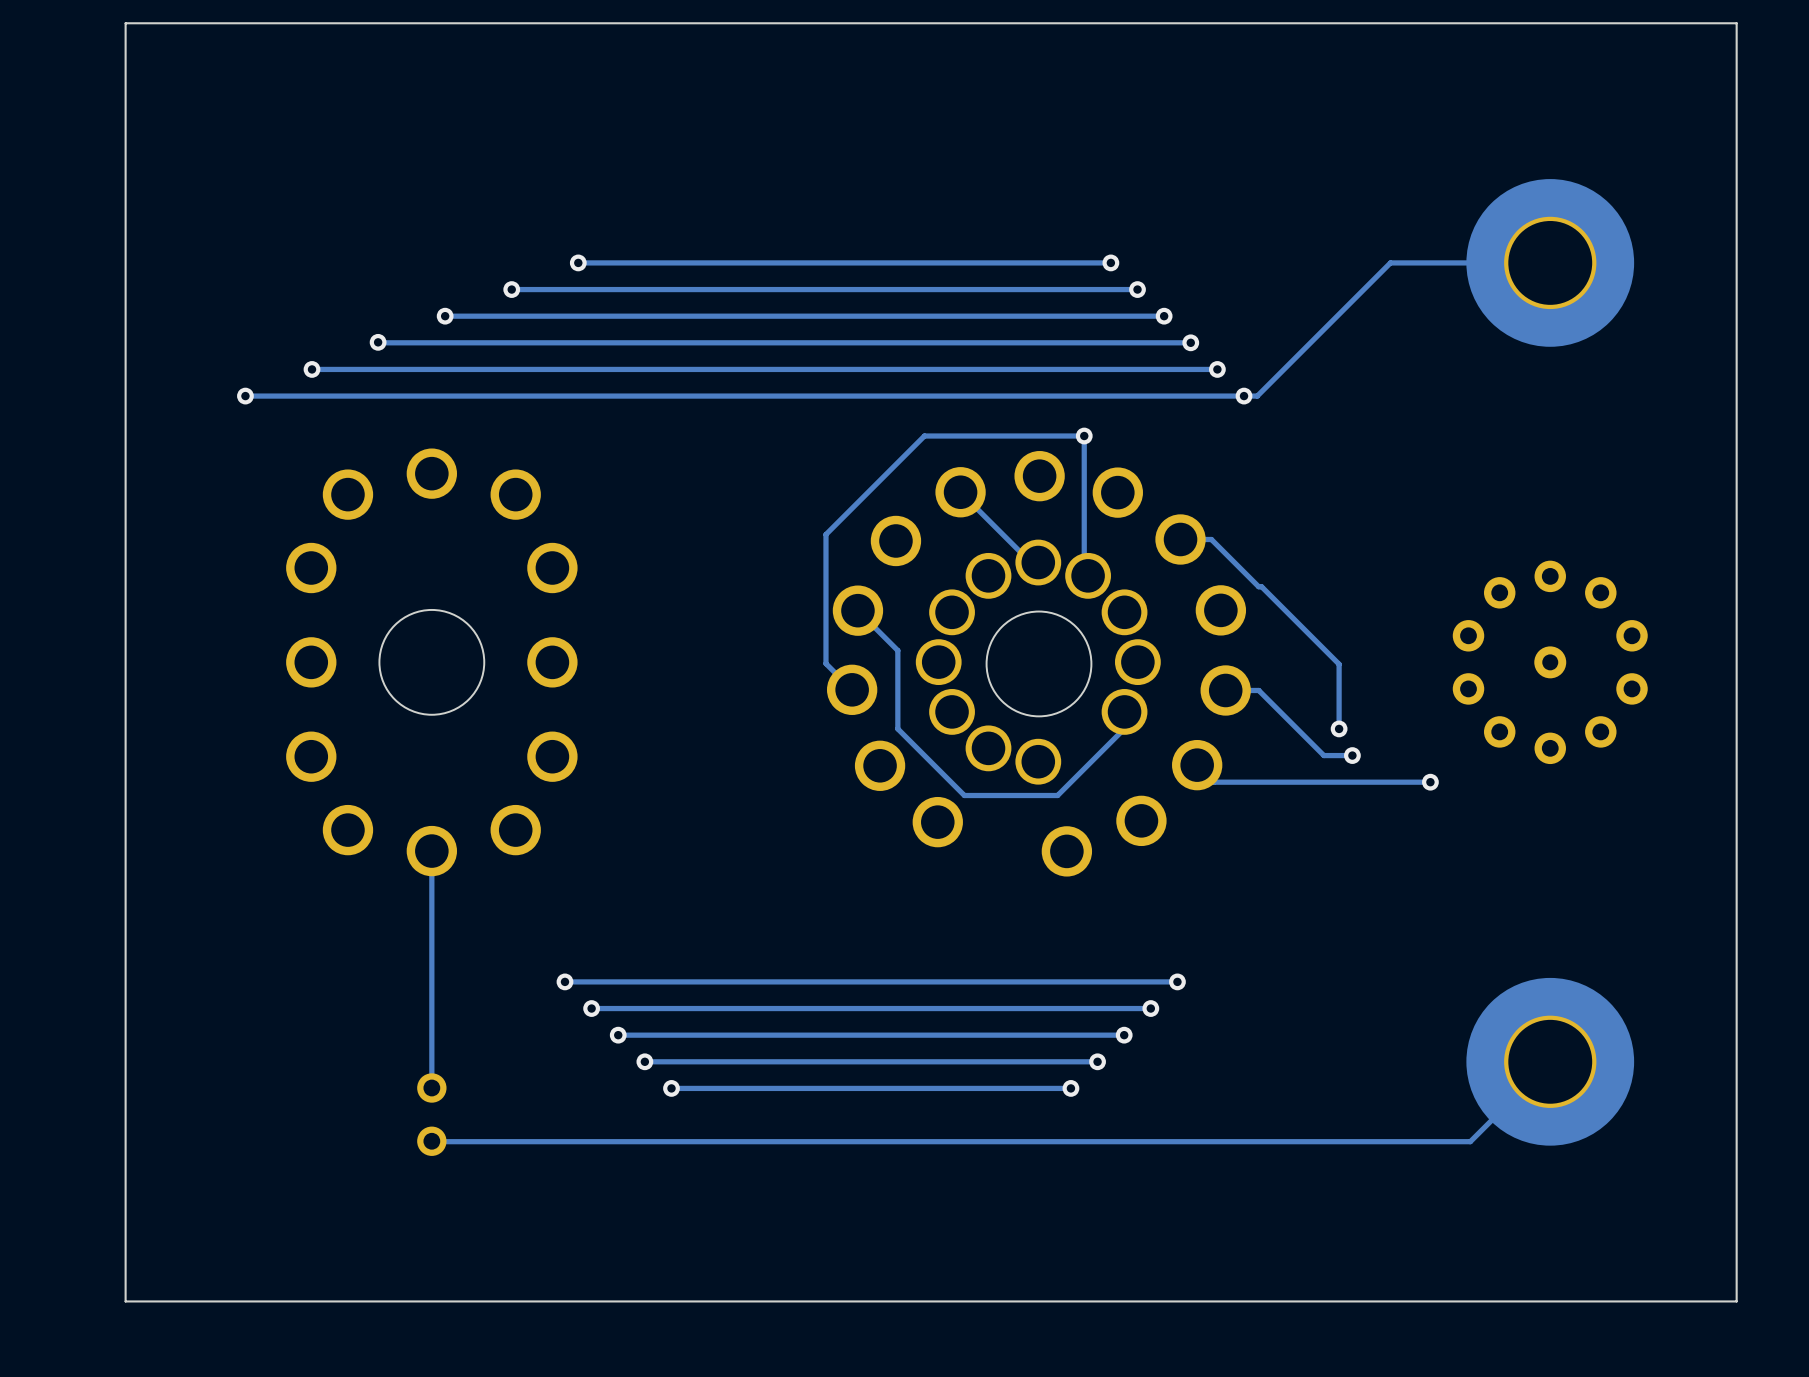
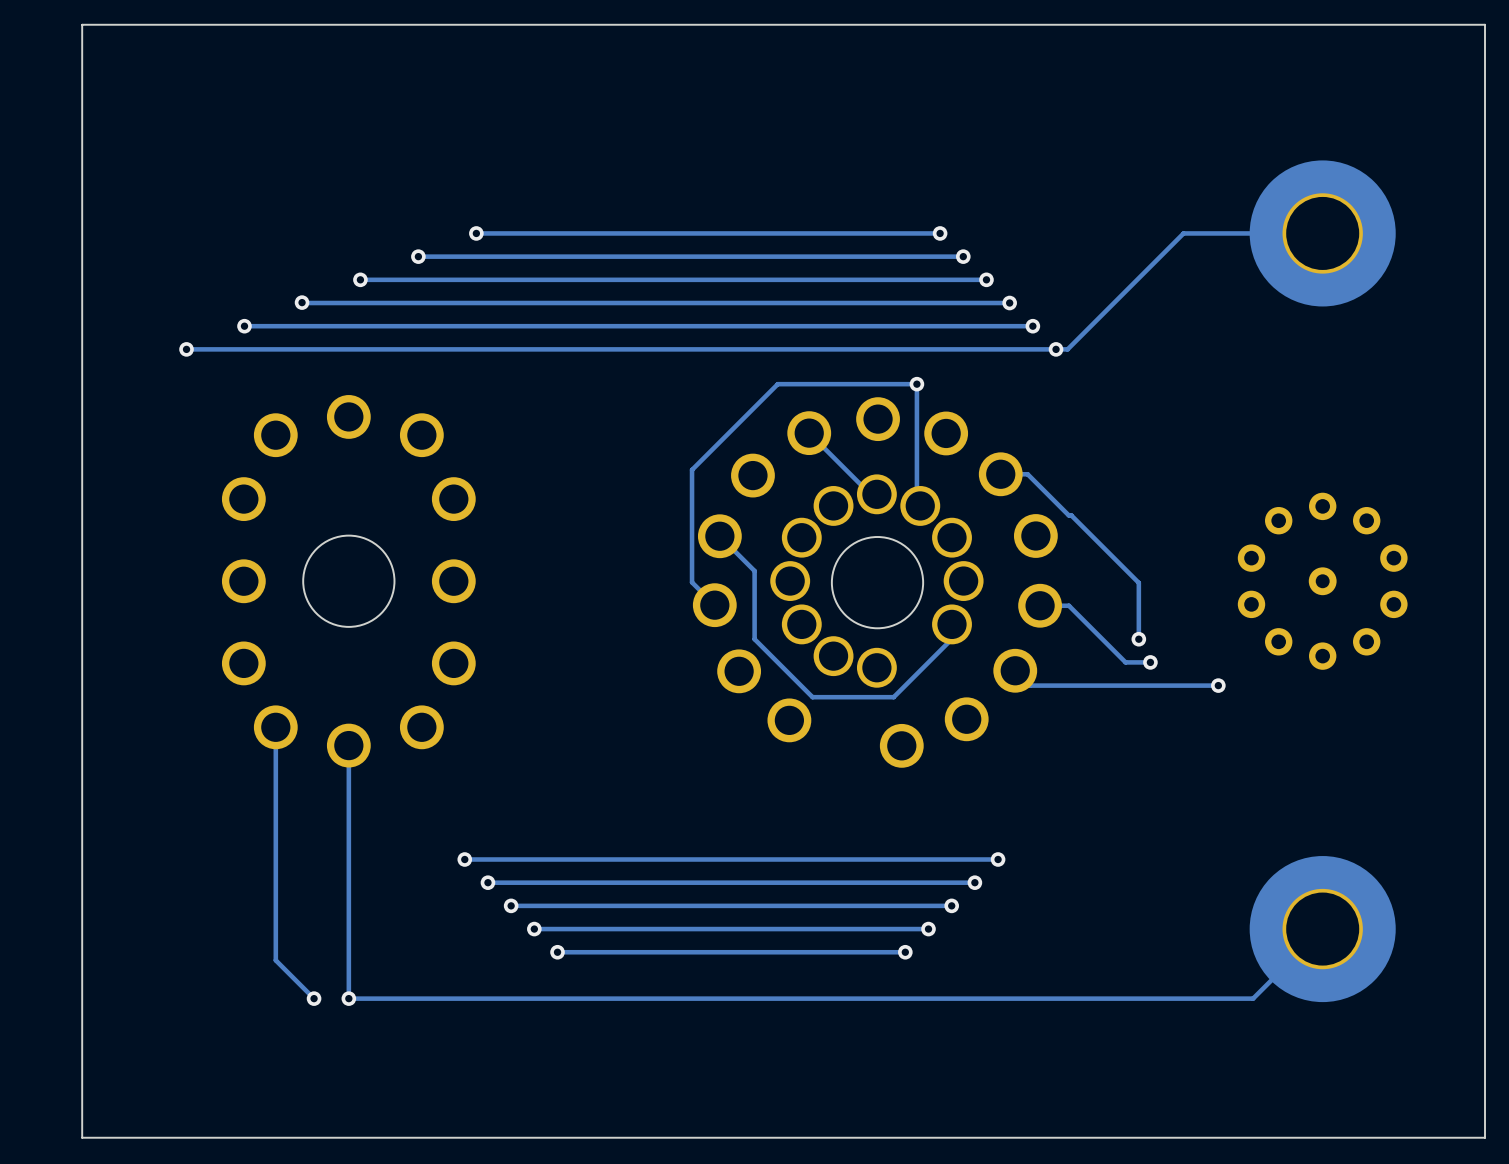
track: none -> (275, 727) (275, 960) (314, 998)
track: none -> (348, 951) (348, 998)
part: (431, 1114) -> none
via: none -> (314, 998)
via: none -> (348, 998)

